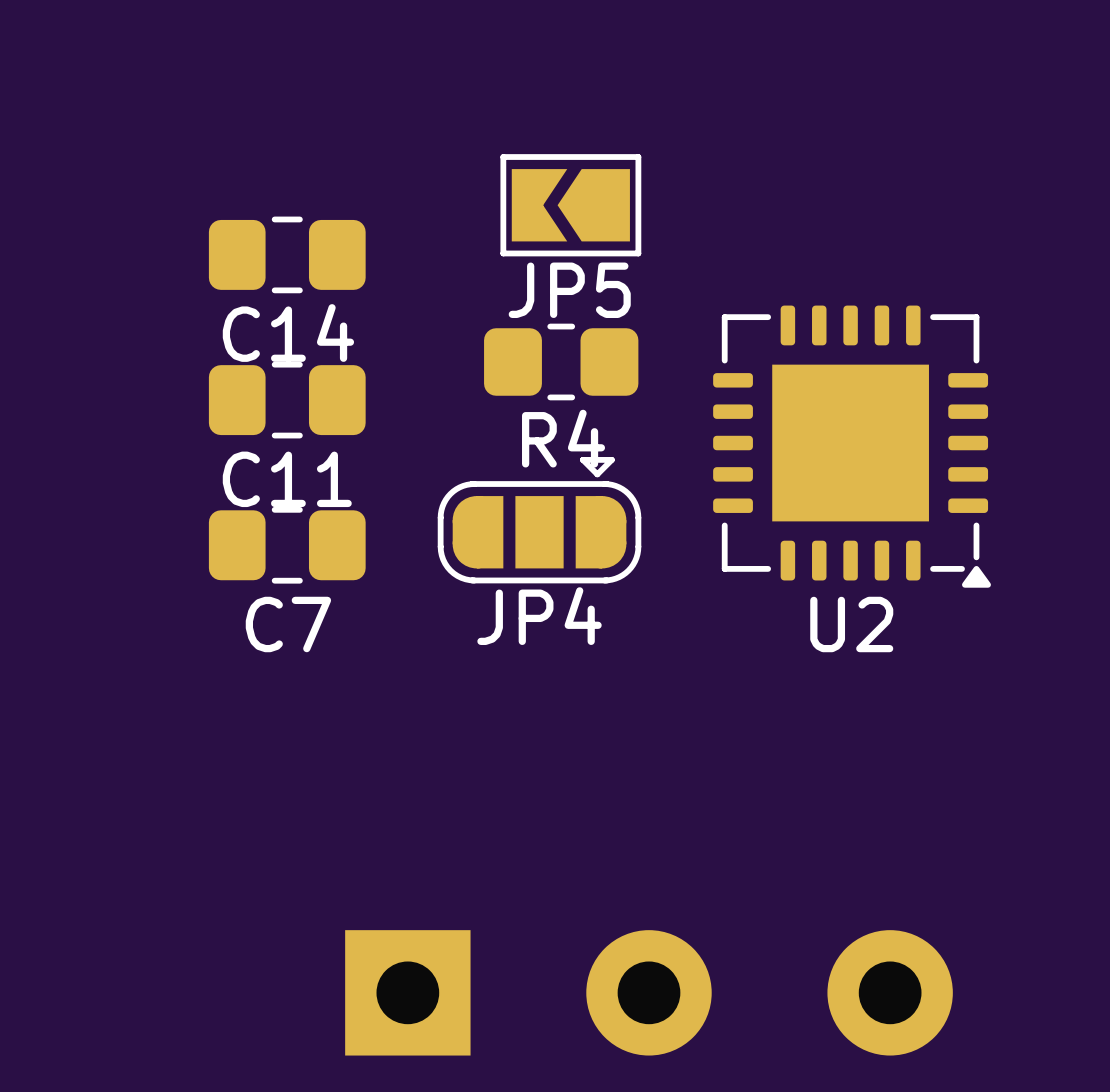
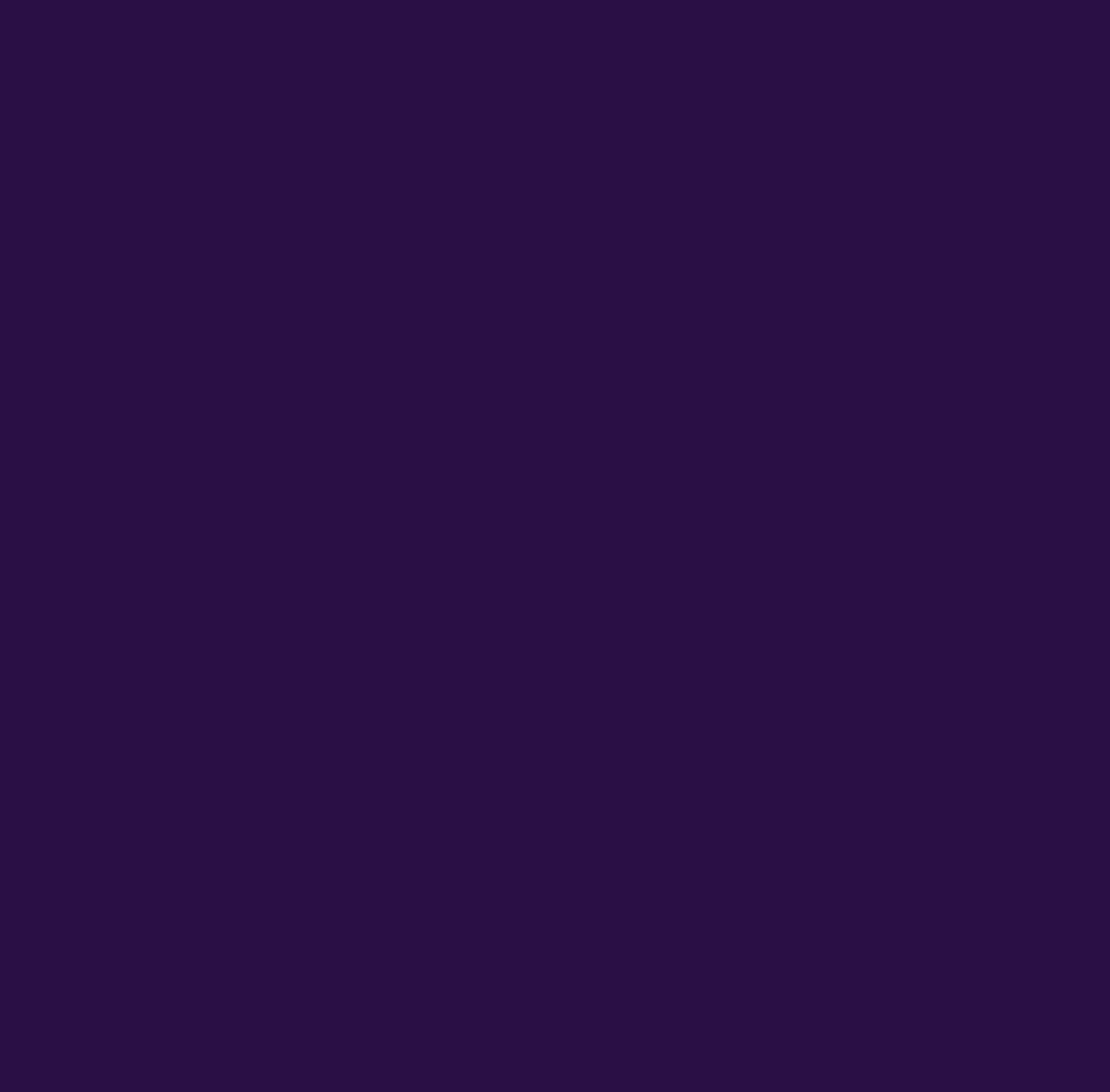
JP5: (570, 205) -> none
C14: (287, 254) -> none
R4: (561, 361) -> none
C11: (287, 400) -> none
U2: (852, 446) -> none
JP4: (539, 520) -> none
C7: (287, 545) -> none
part: (648, 992) -> none

